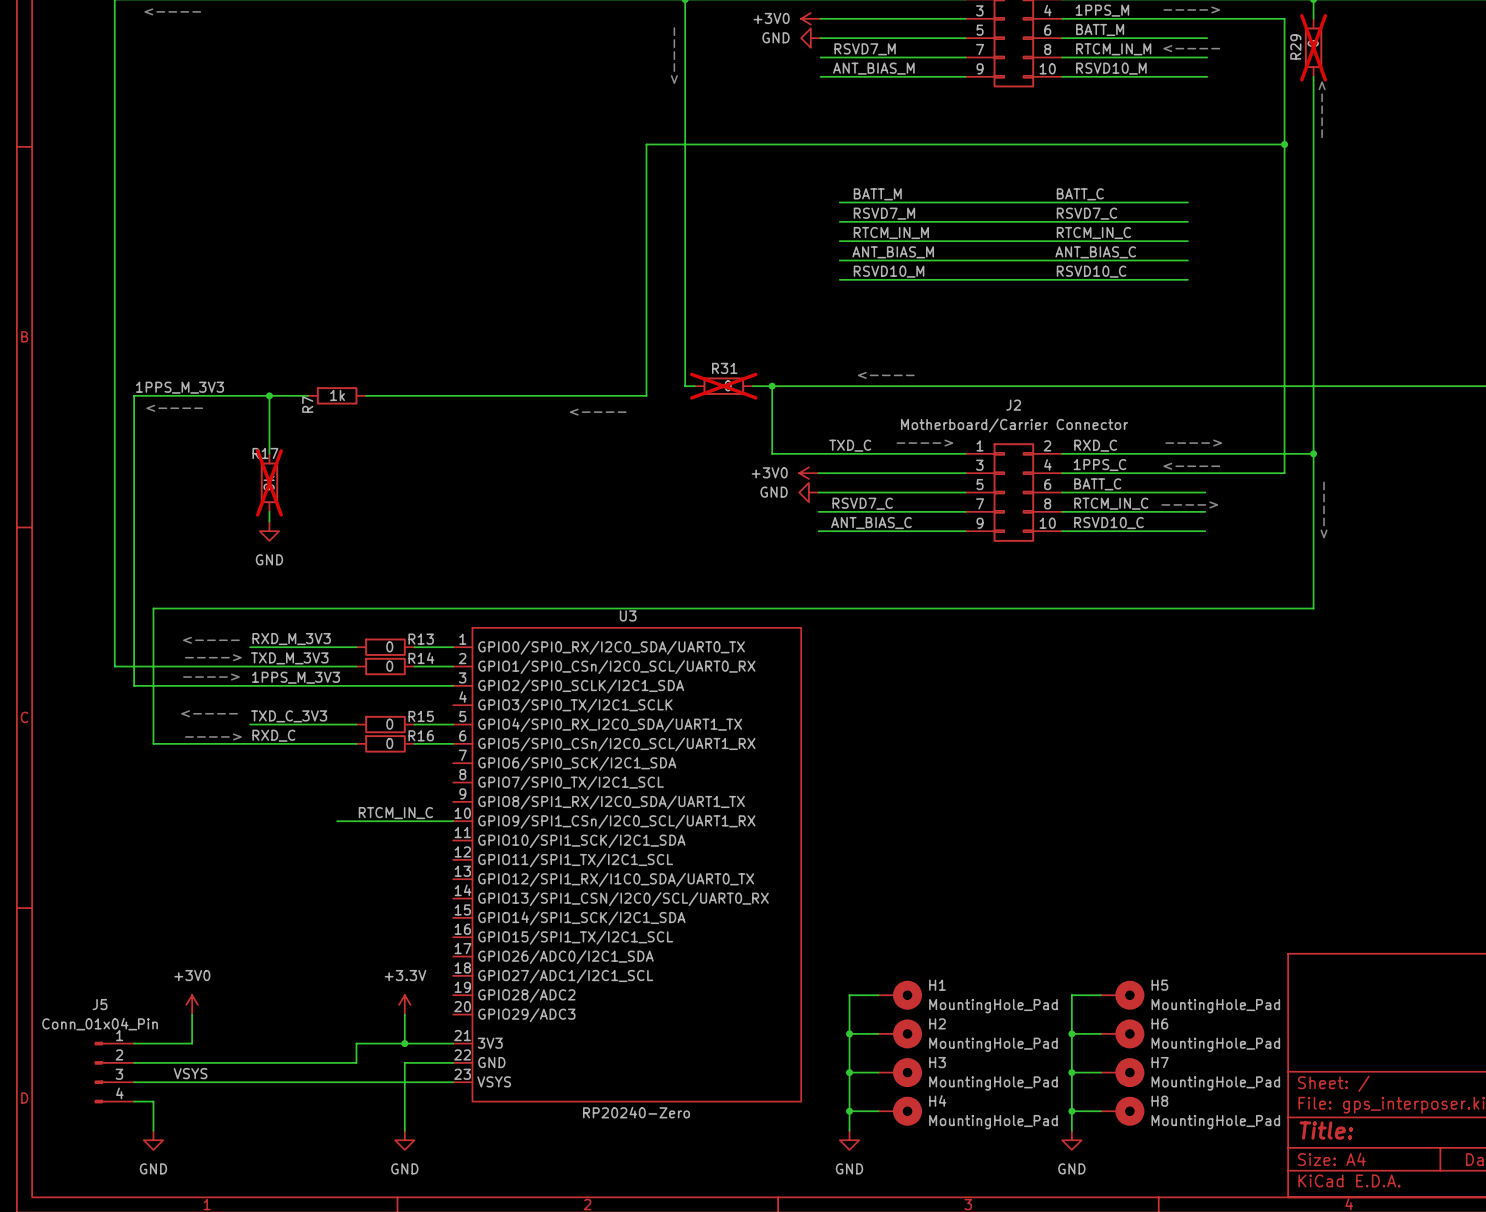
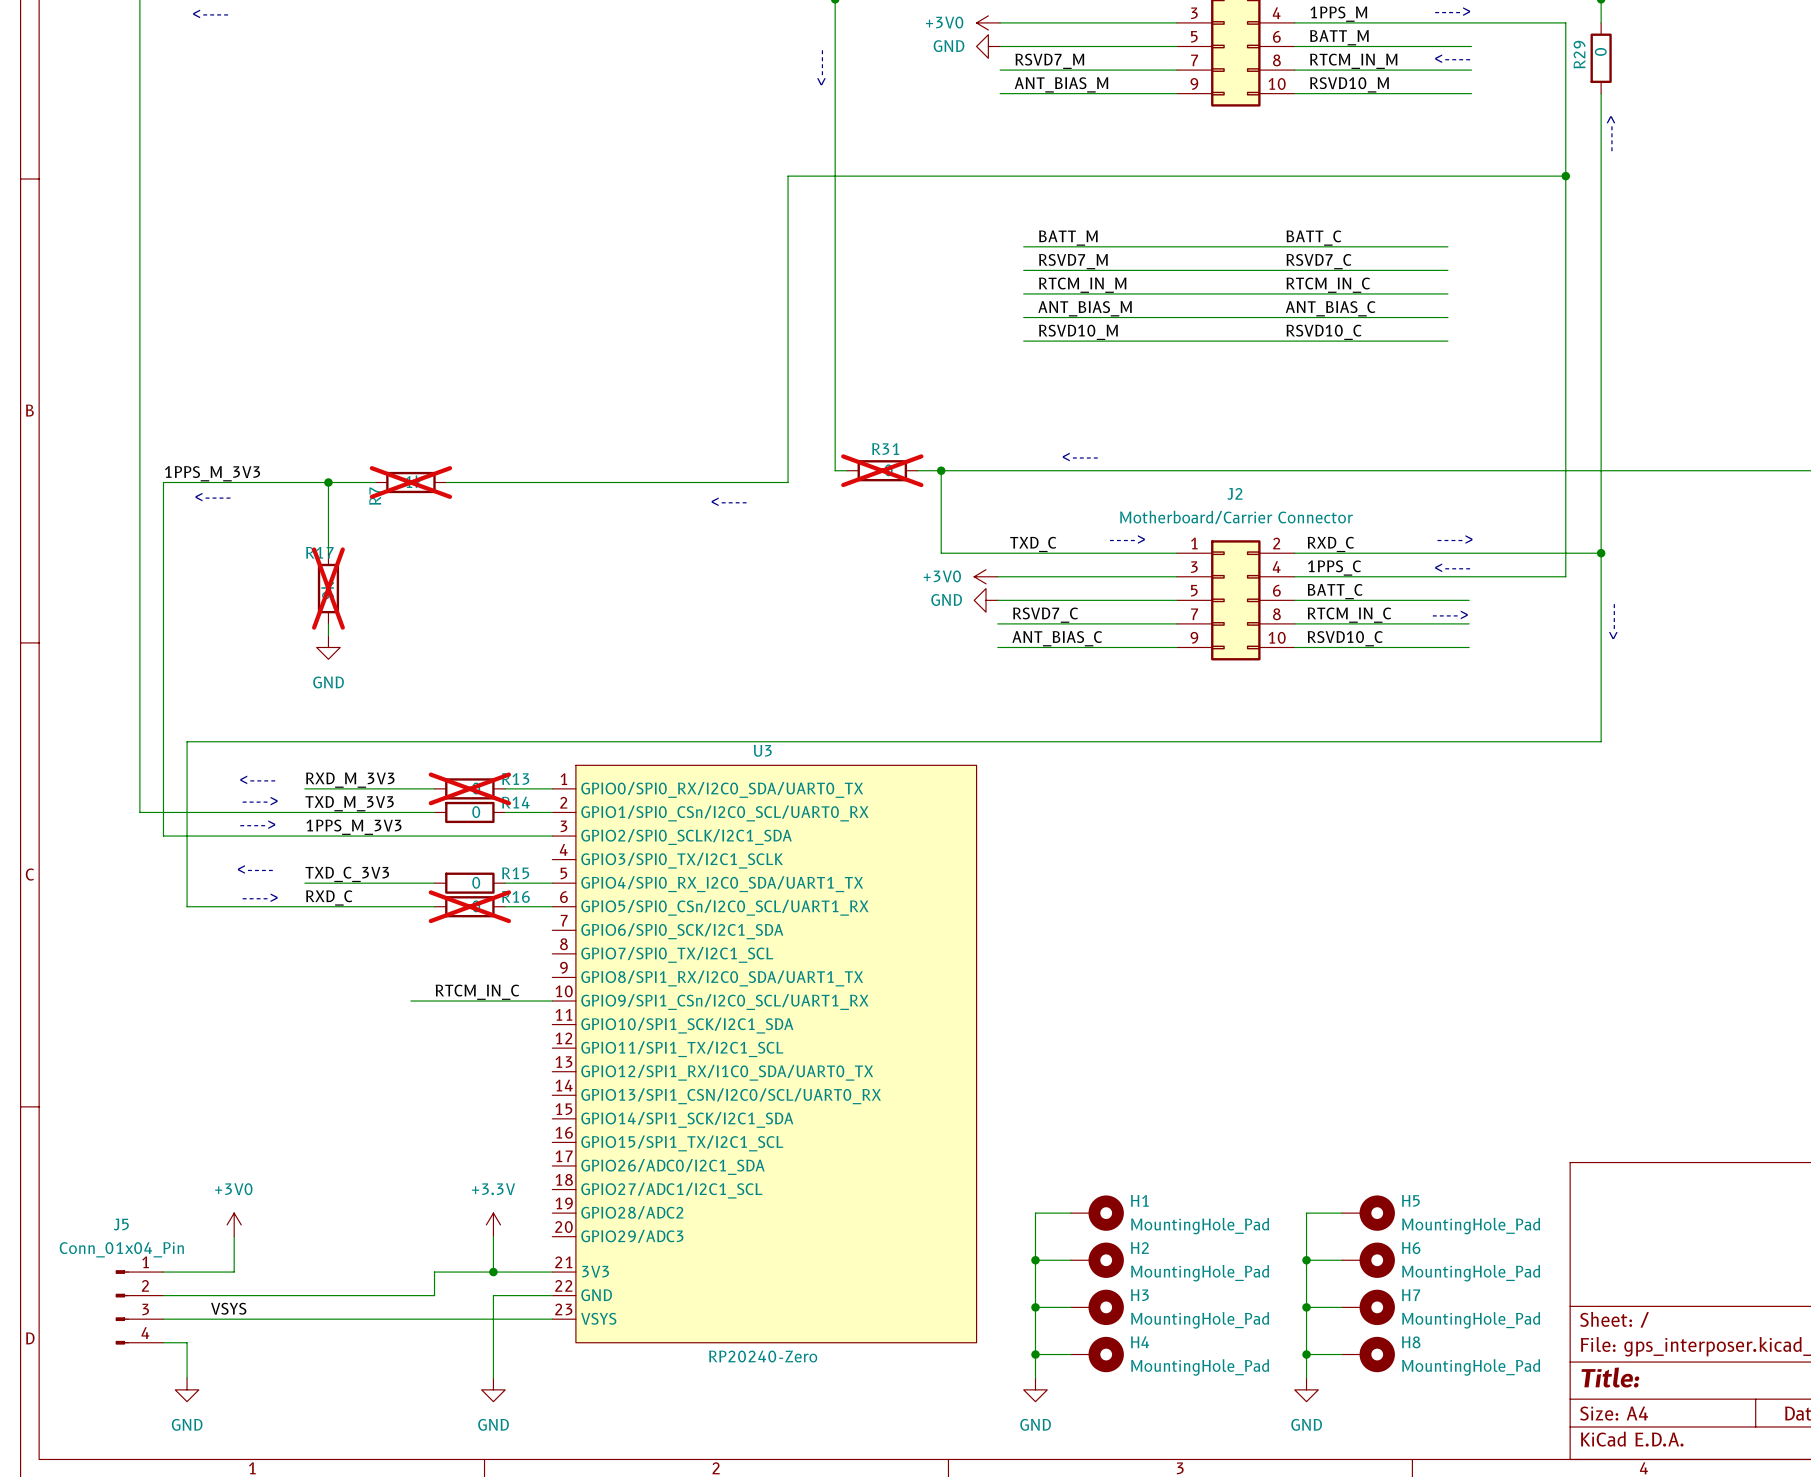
R29 do-not-place cross: (1313, 47) -> none
R7 do-not-place cross: none -> (410, 482)
R13 do-not-place cross: none -> (469, 788)
R16 do-not-place cross: none -> (469, 906)

